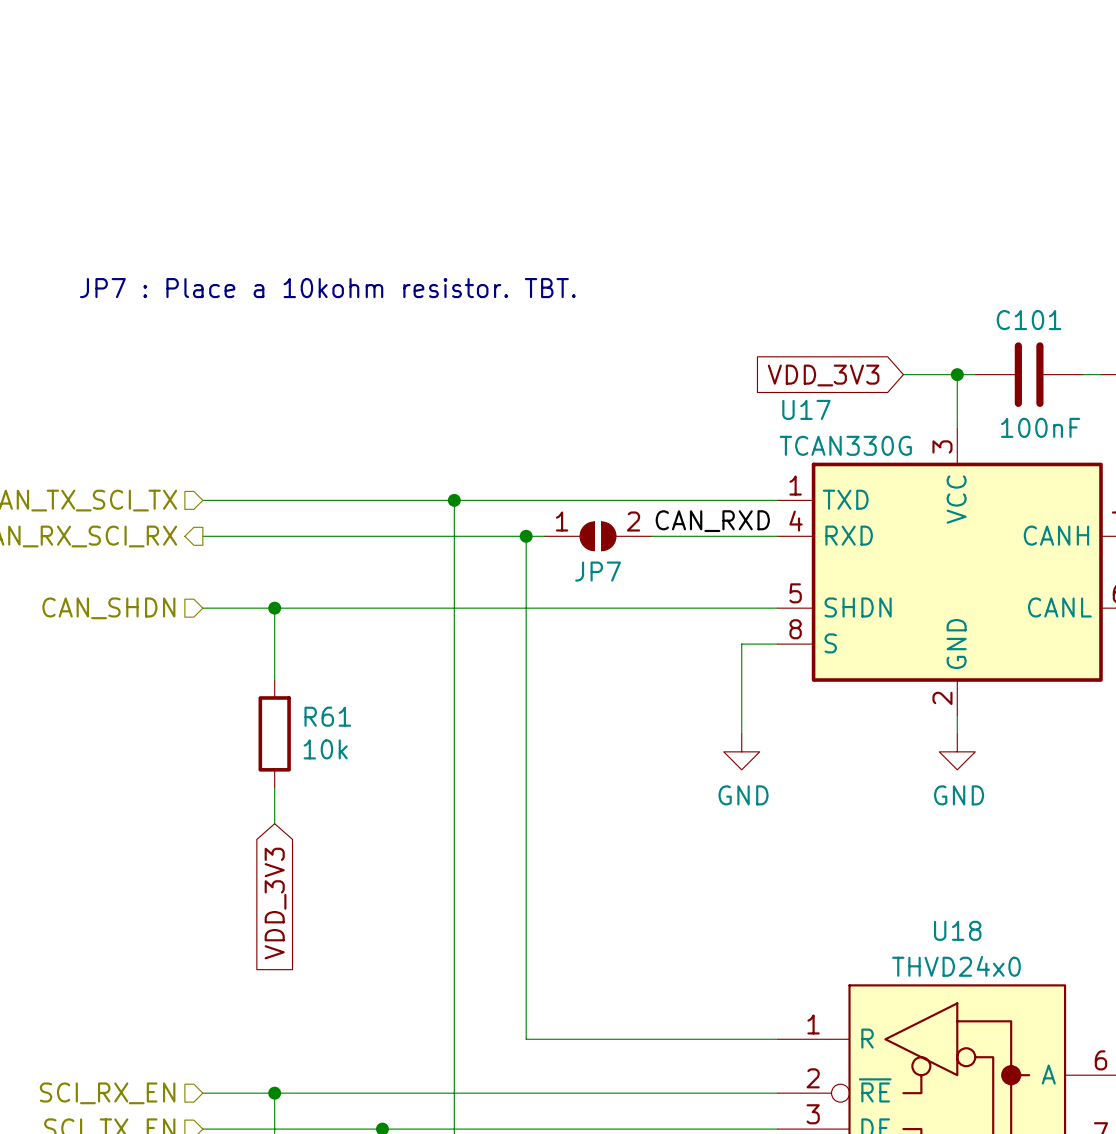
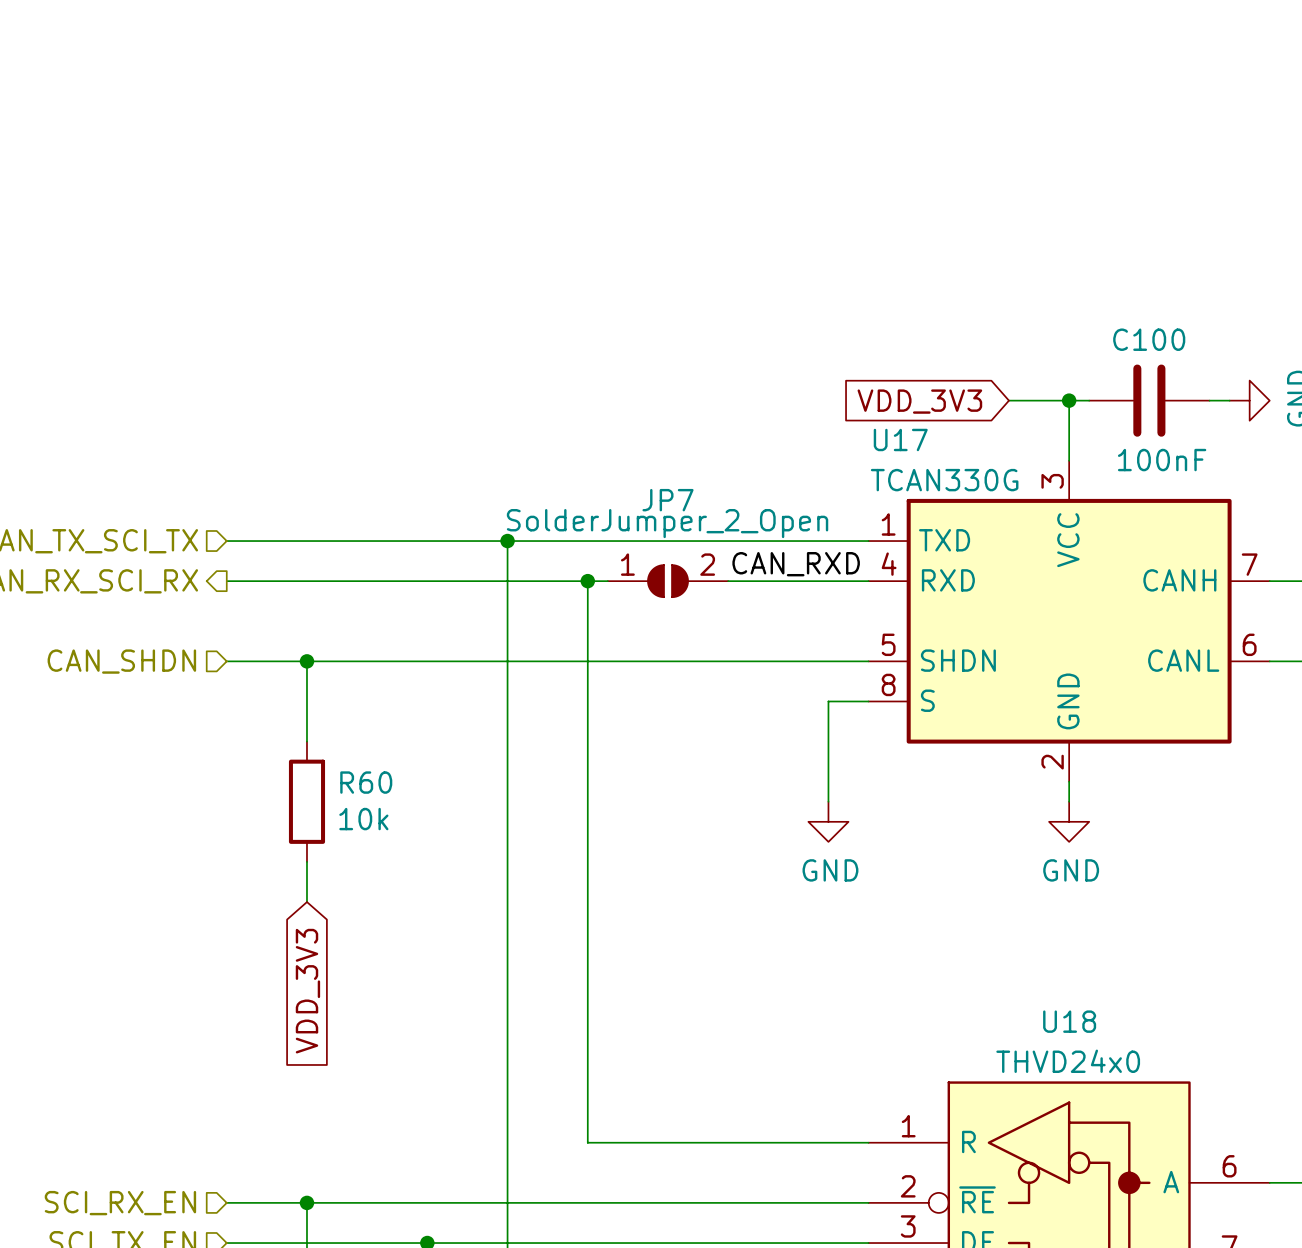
text: JP7 : Place a 10kohm resistor. TBT. (327, 288) -> none
C101 name: C101 (1029, 320) -> C100 (1149, 339)
JP7 value: none -> SolderJumper_2_Open (667, 523)
JP7 name position: JP7 (598, 571) -> JP7 (668, 500)
R61 name: R61 (327, 716) -> R60 (366, 782)

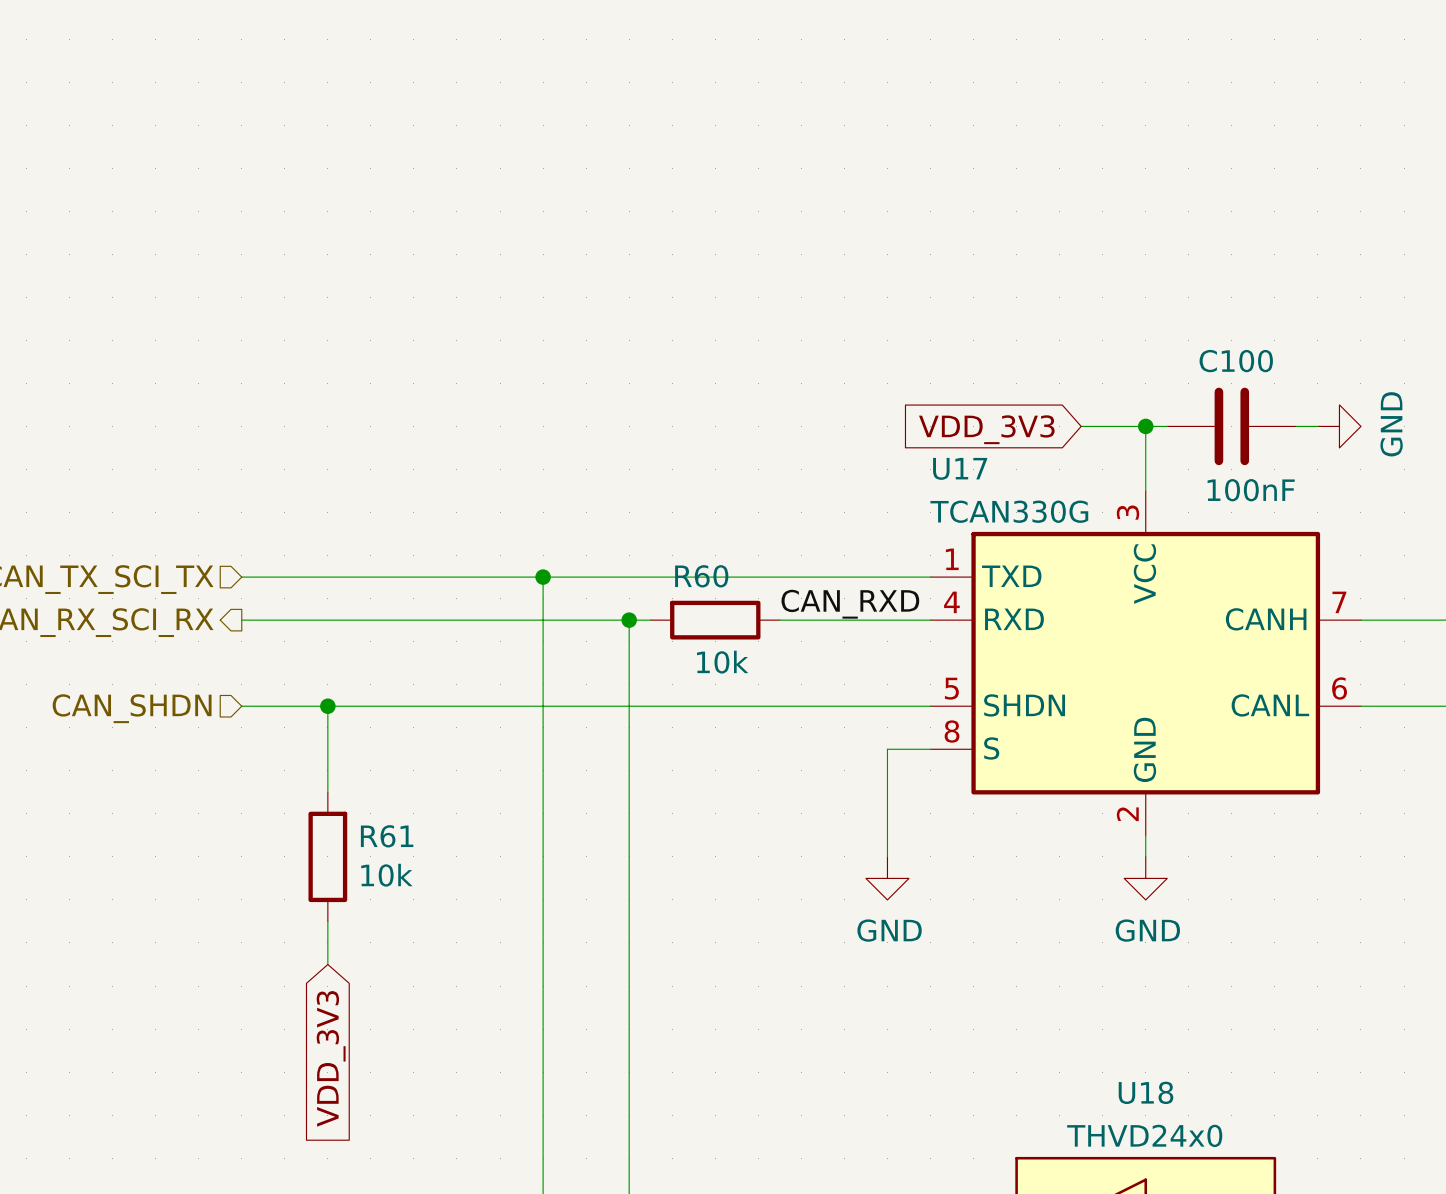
JP7: SolderJumper_2_Open (668, 581) -> none
R60: none -> 10k (715, 620)
R60 name: R60 (366, 782) -> R61 (387, 836)

